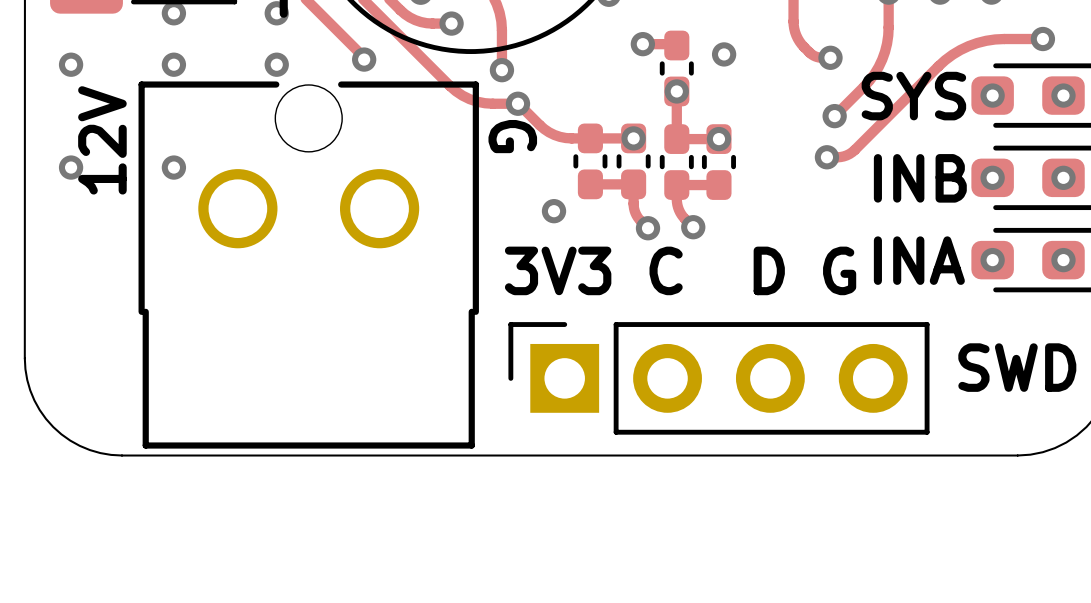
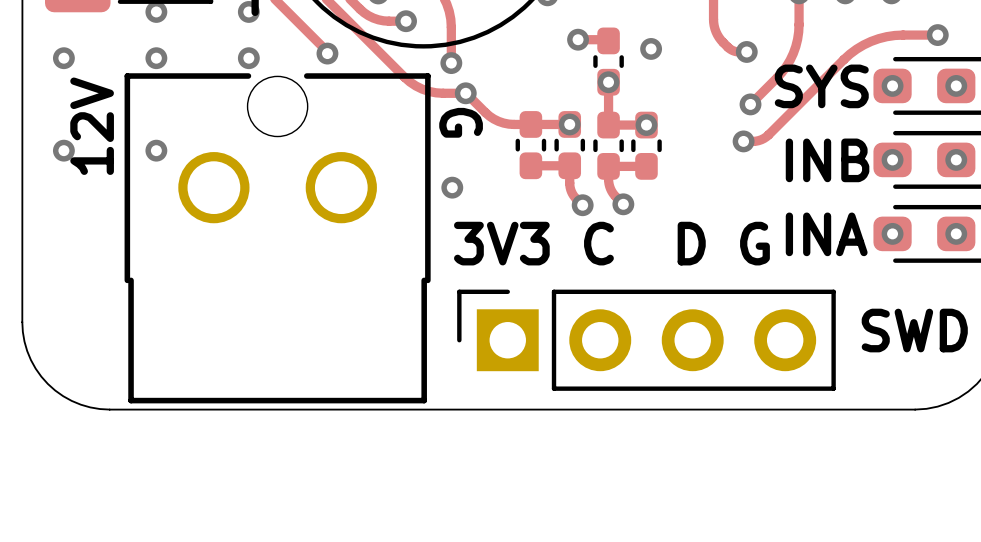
via position: (554, 211) -> (452, 187)

